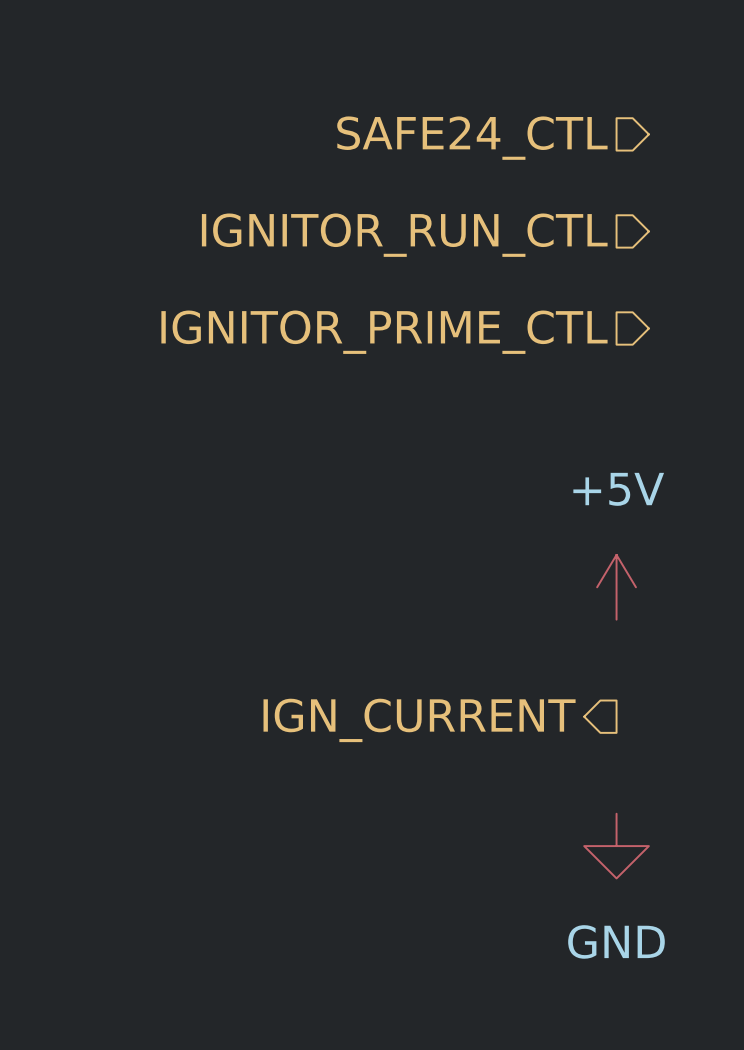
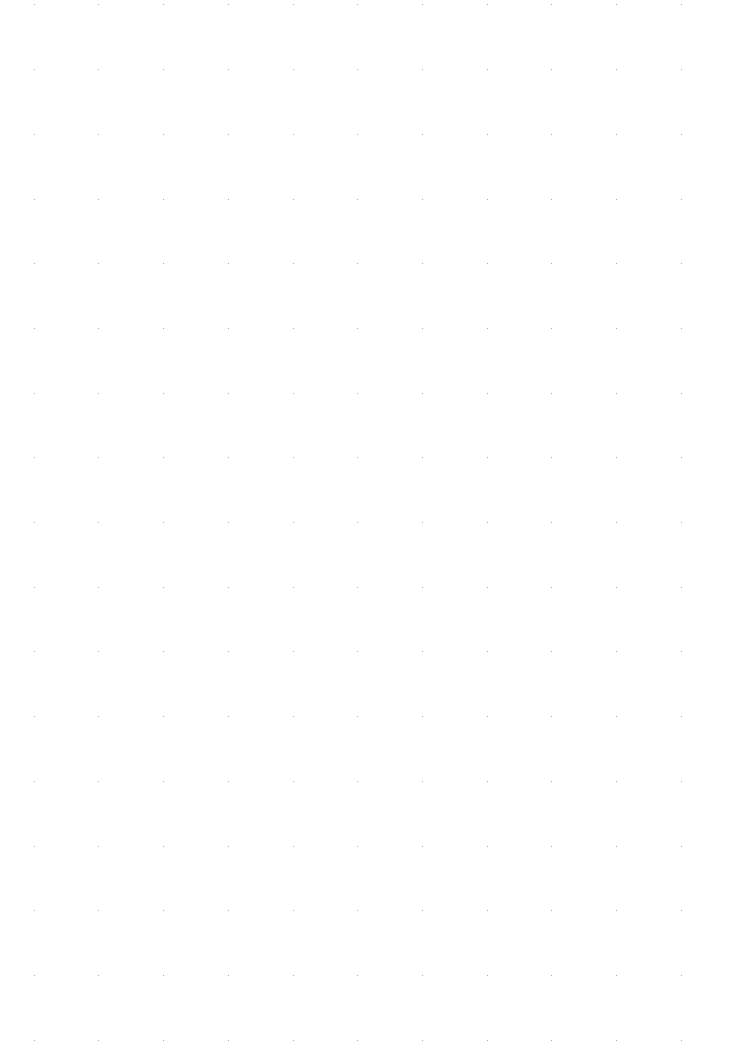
hierarchical label: SAFE24_CTL (472, 138) -> none
hierarchical label: IGNITOR_RUN_CTL (404, 235) -> none
hierarchical label: IGNITOR_PRIME_CTL (384, 332) -> none
power symbol: +5V (616, 587) -> none
hierarchical label: IGN_CURRENT (419, 720) -> none
power symbol: GND (616, 846) -> none

